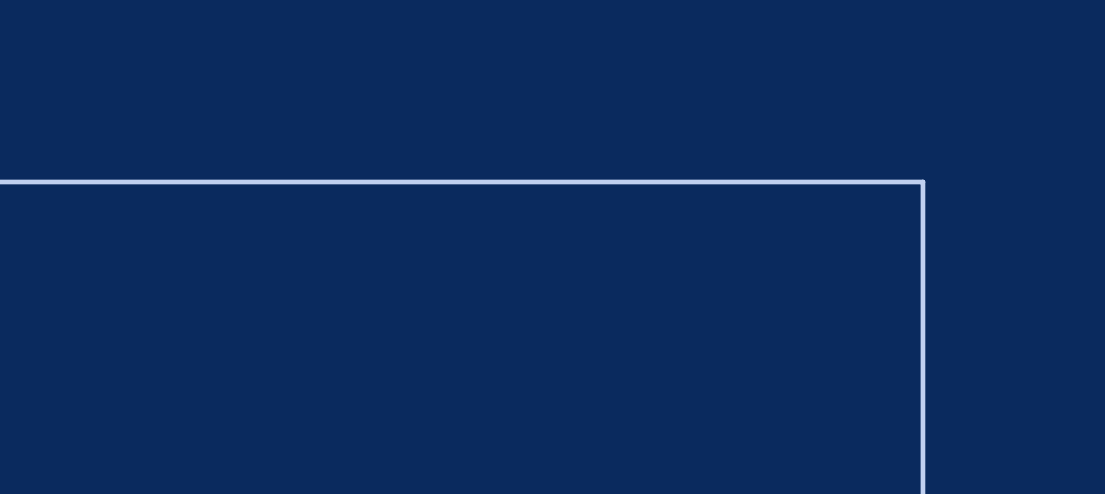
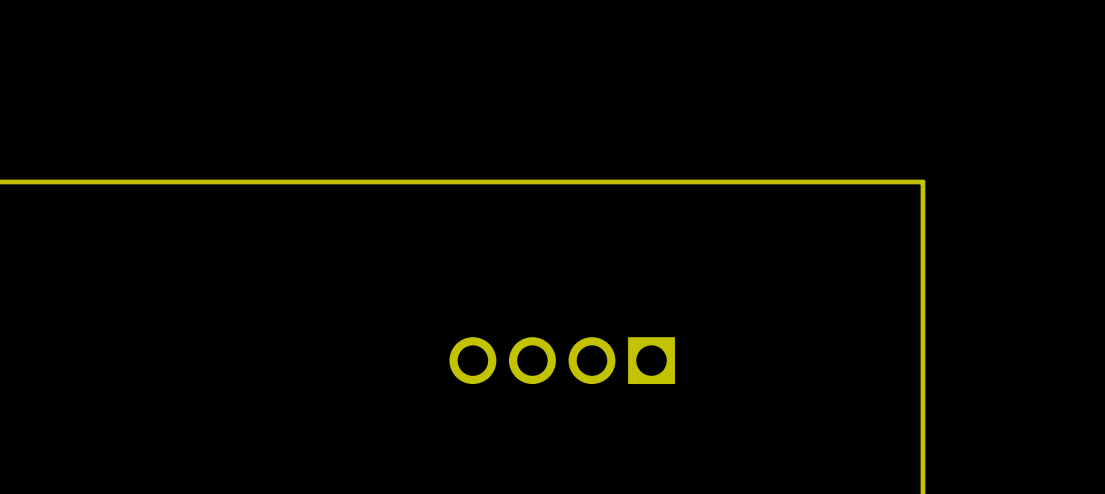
part: none -> (562, 360)

